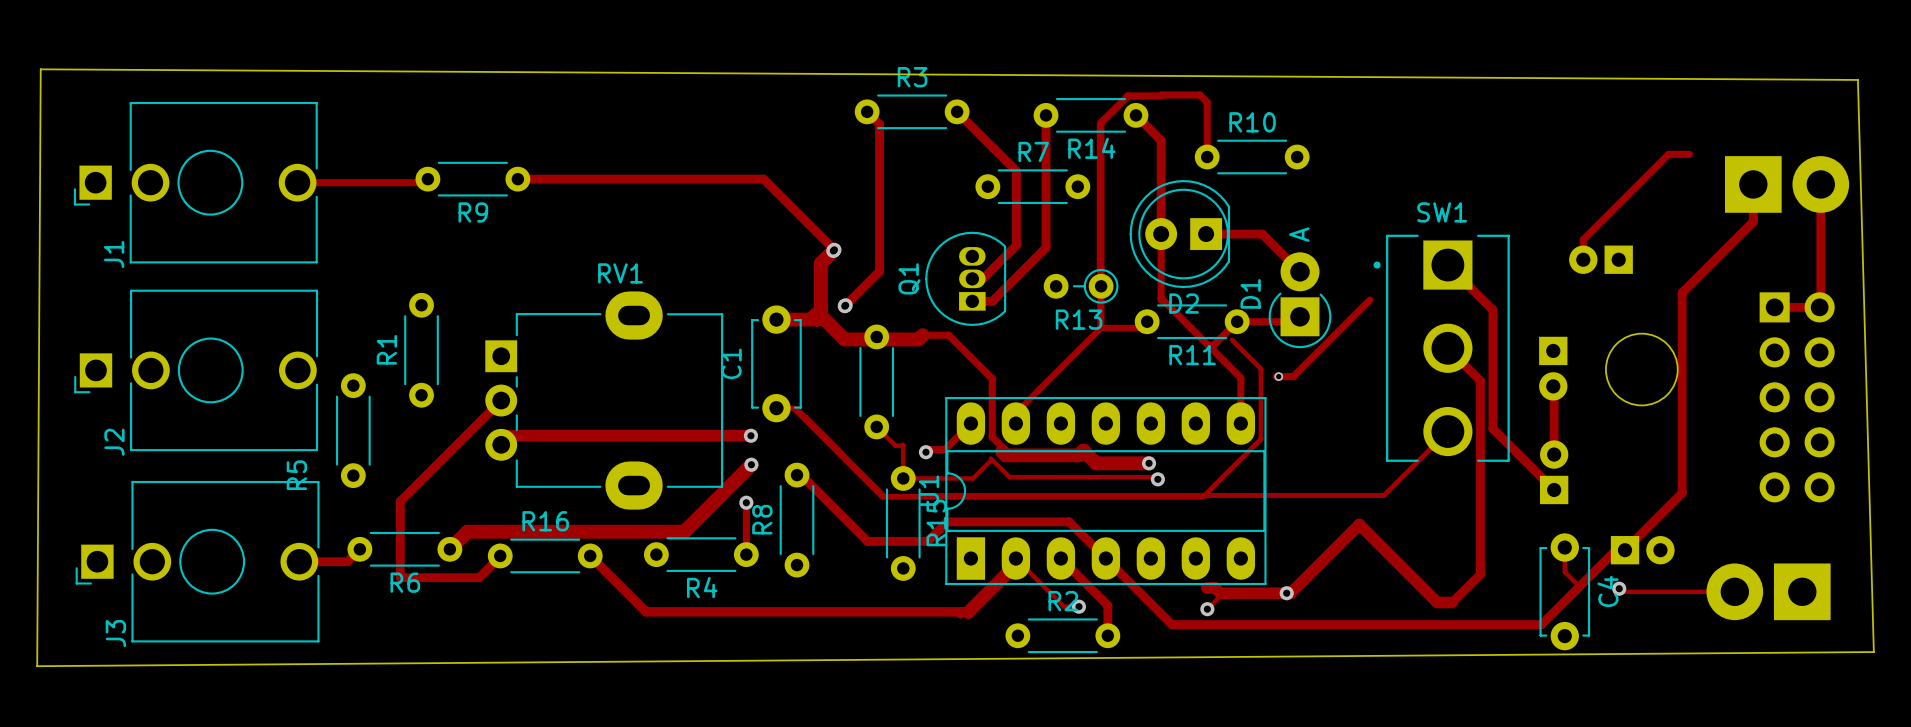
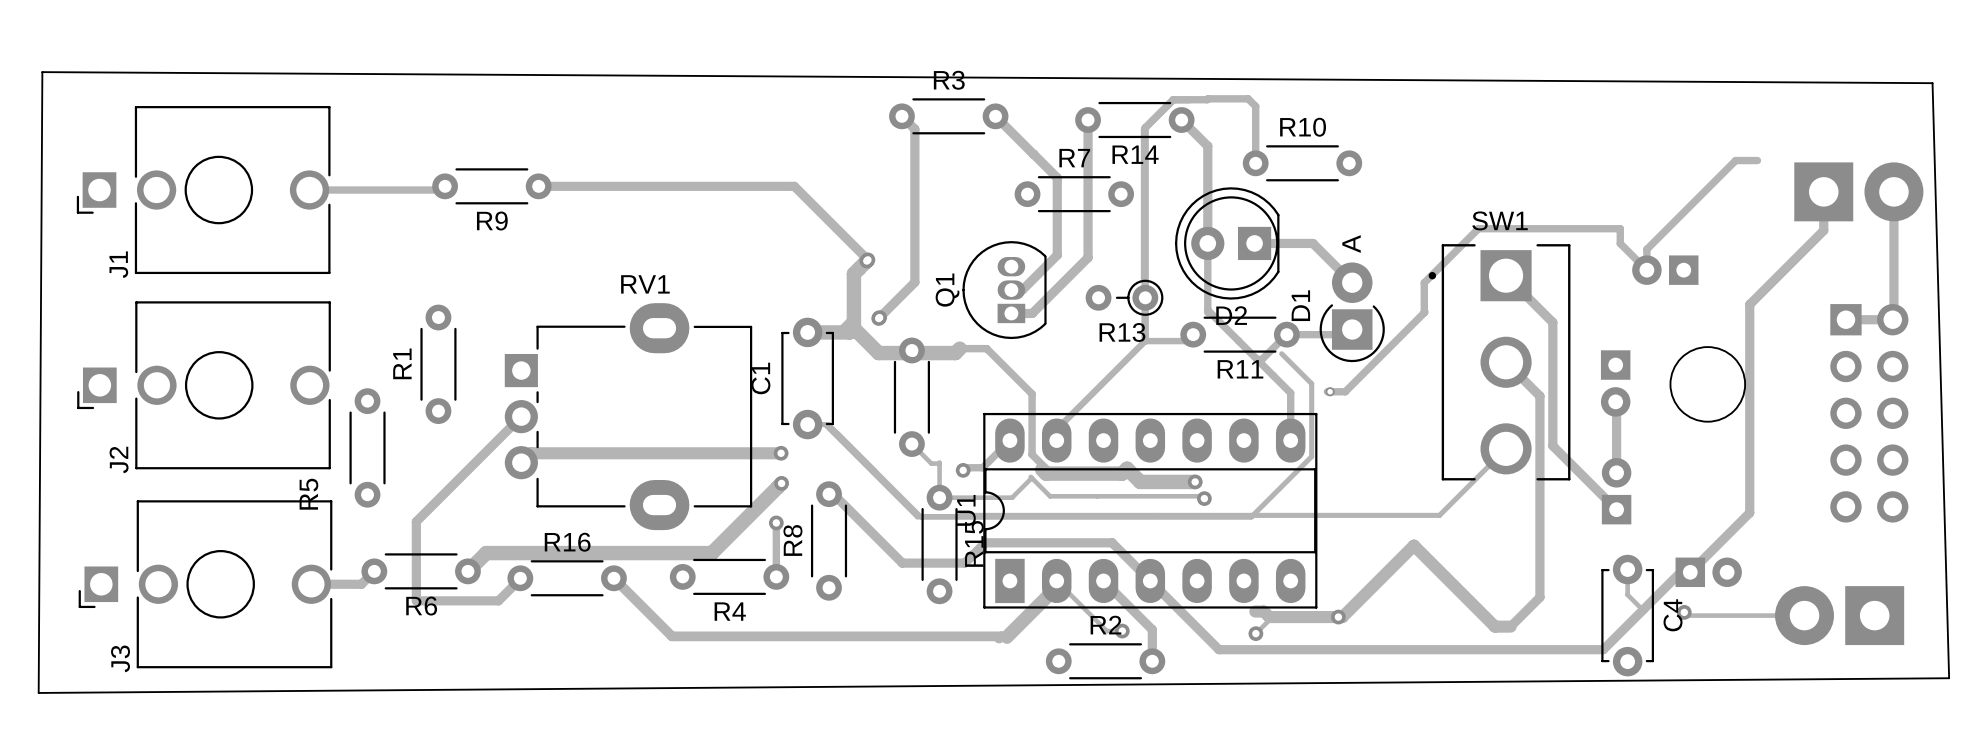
track: none -> (1646, 270) (1620, 243) (1620, 228) (1478, 228) (1424, 282) (1424, 312)

